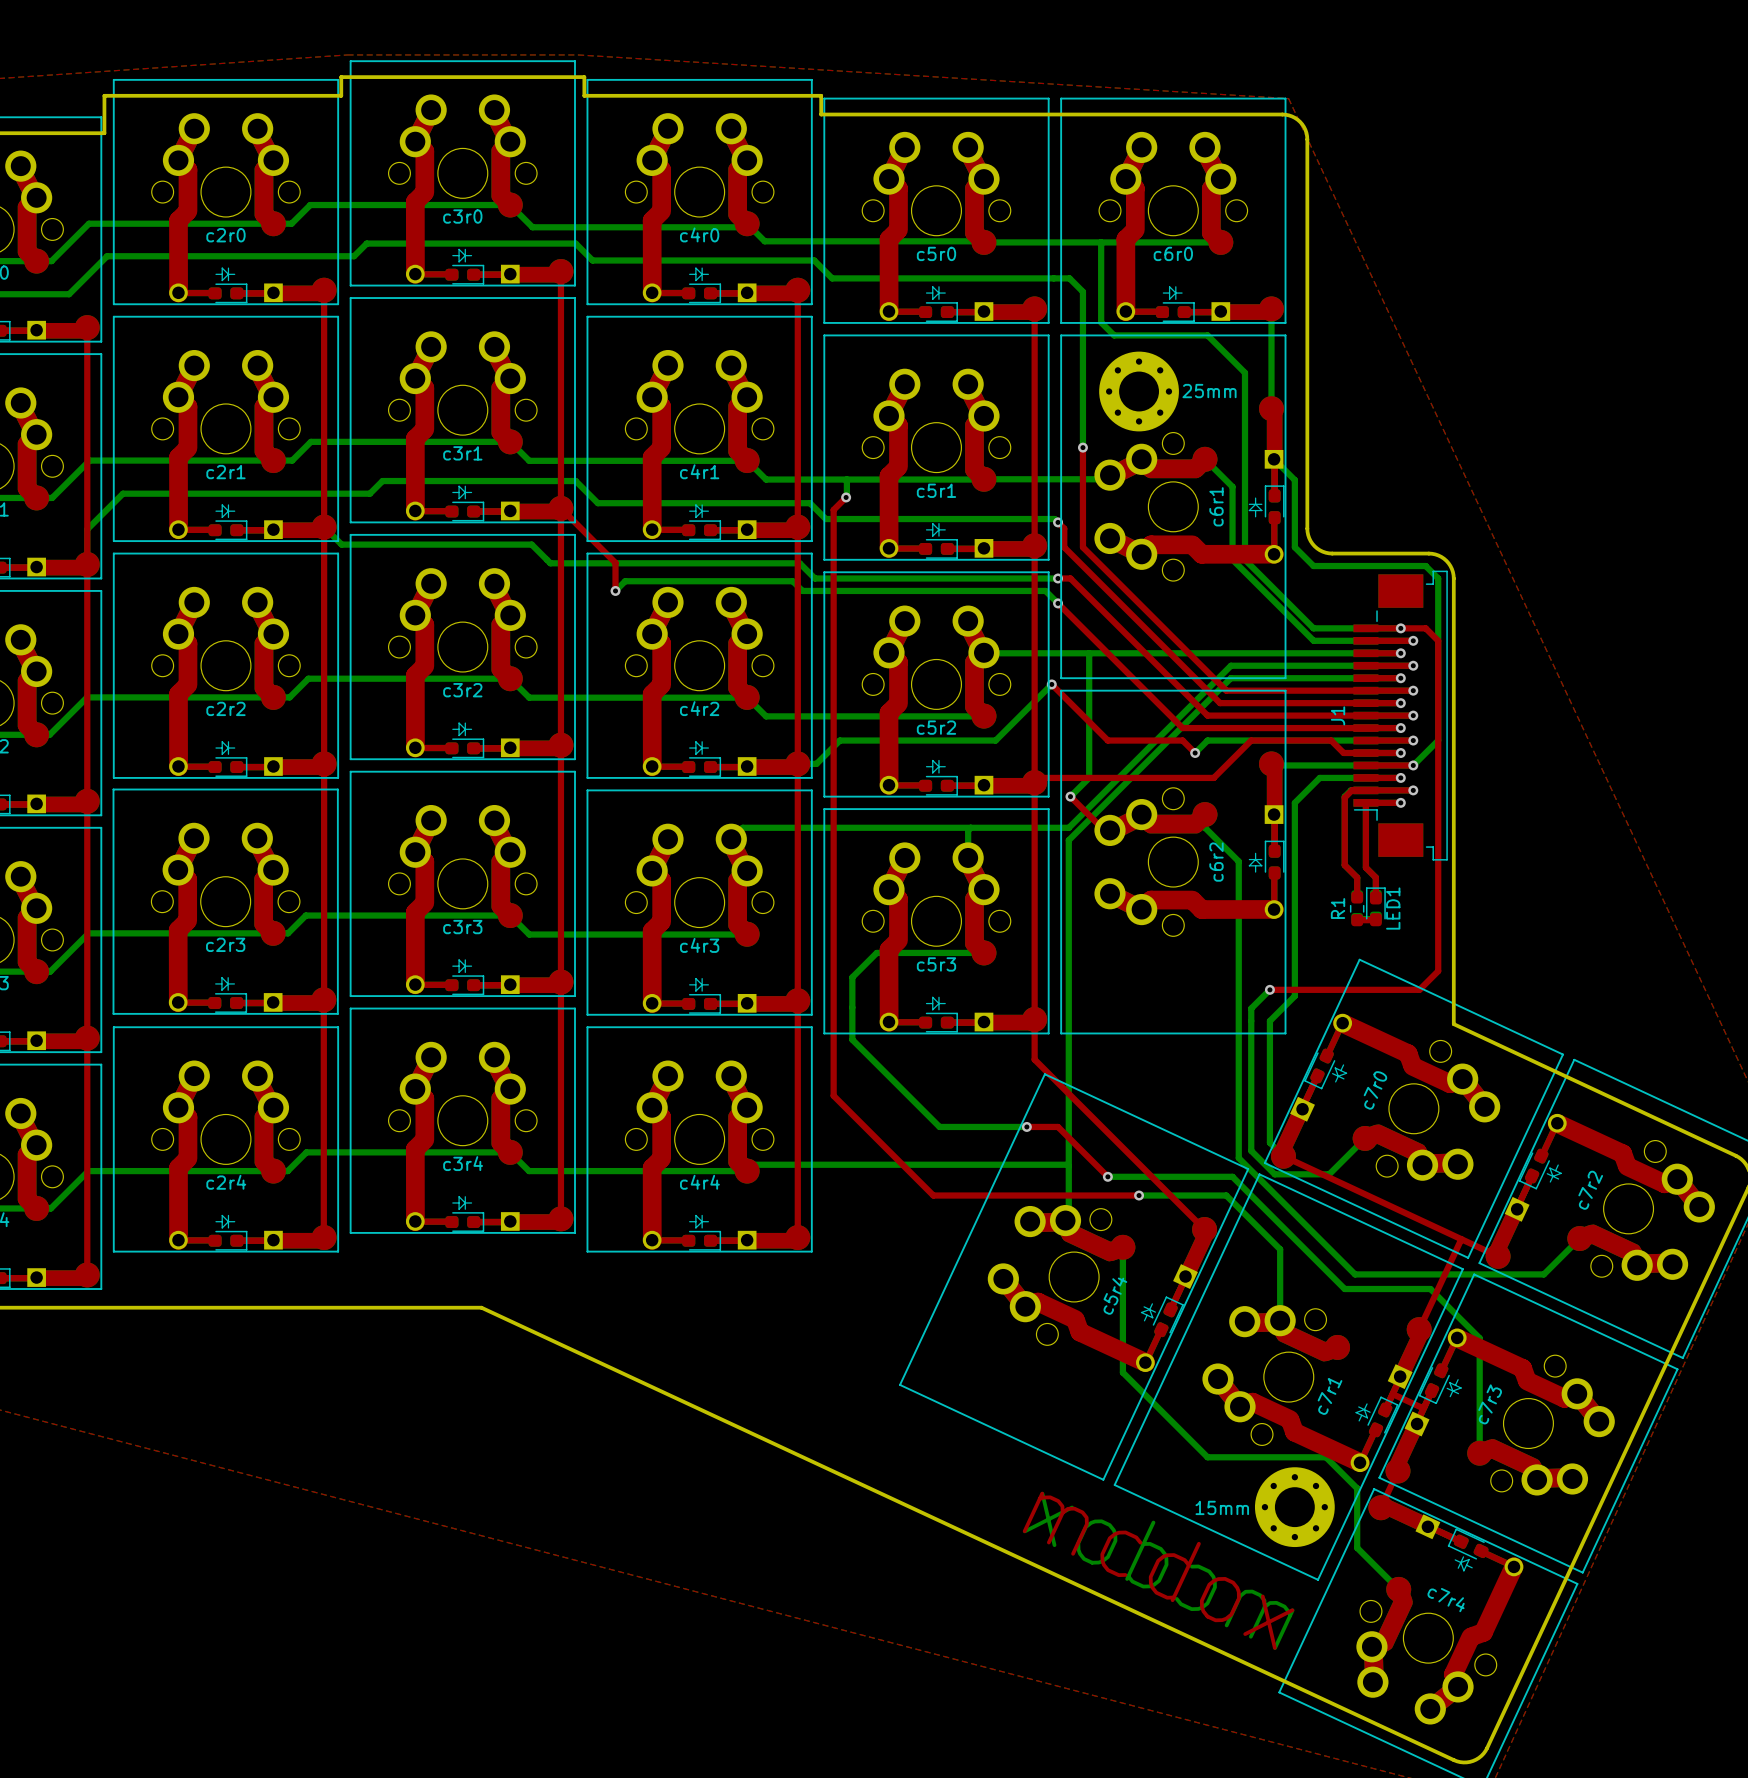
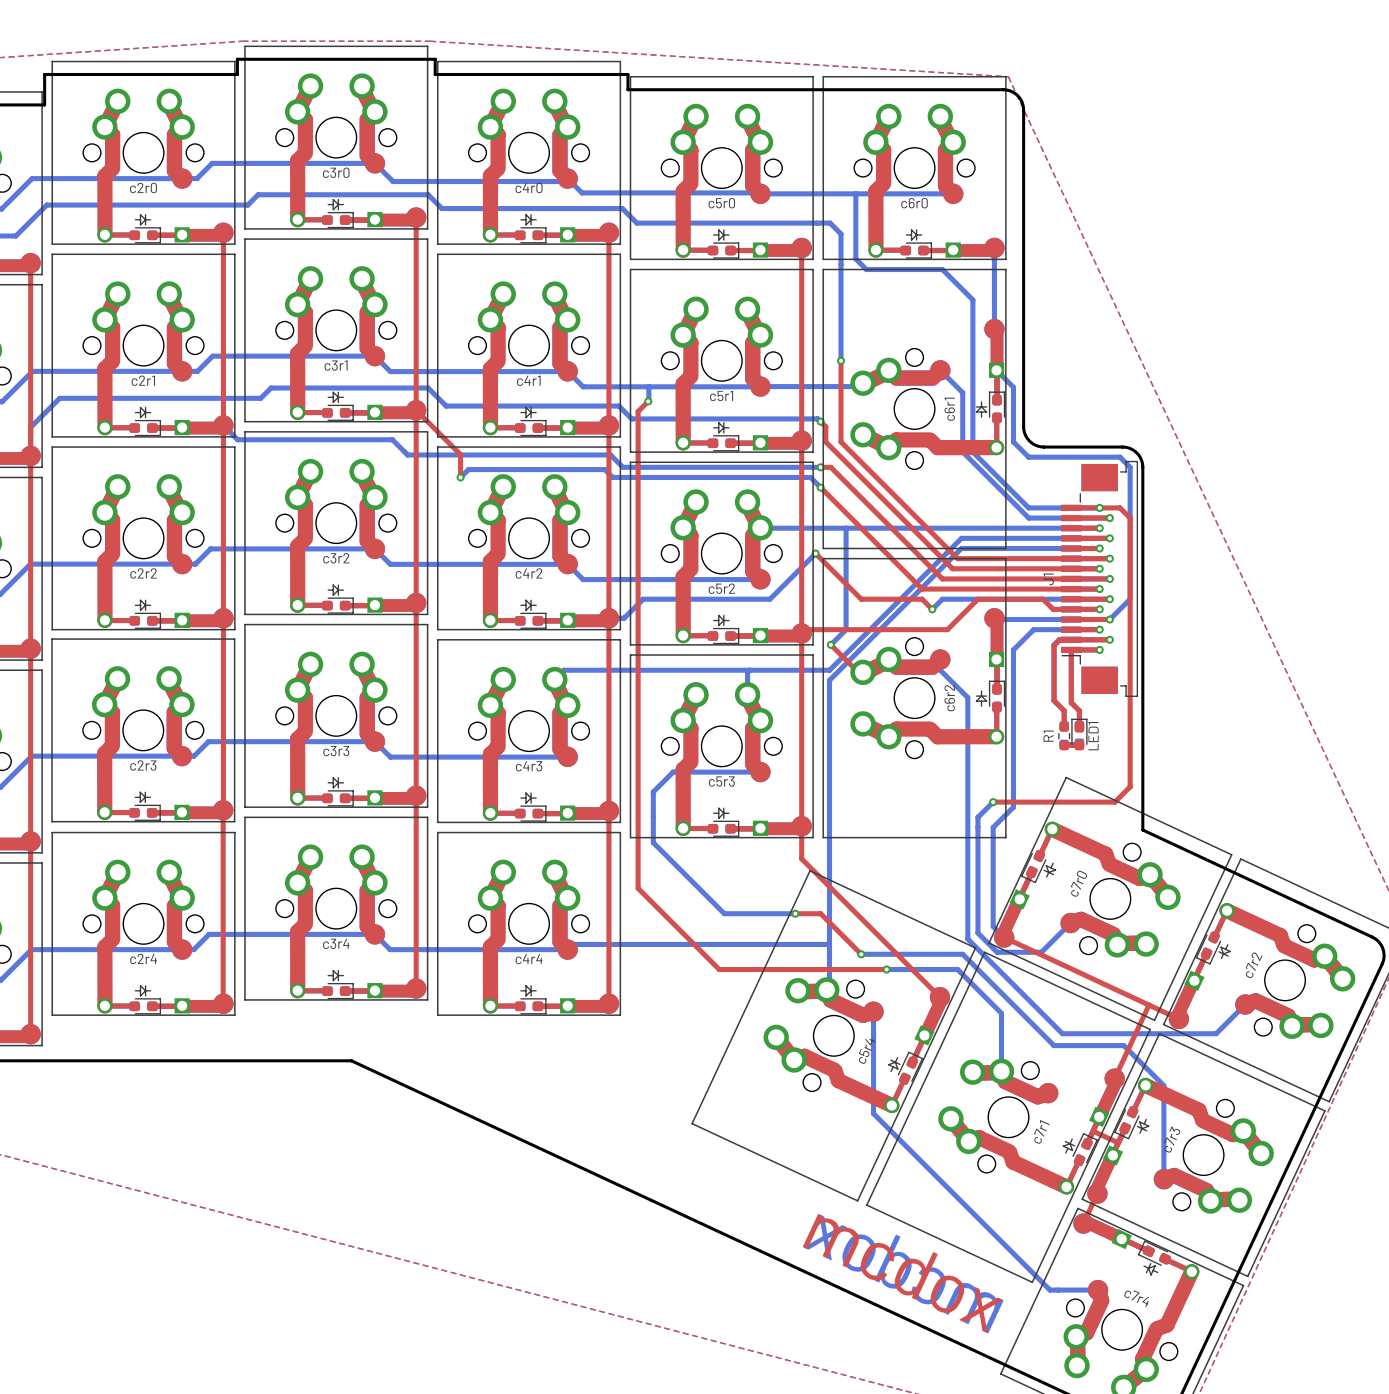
25mm: (1139, 391) -> none
bottom track: (1207, 1457) (1326, 1457) (1357, 1488) (1357, 1547) (1398, 1589) -> (942, 1182) (1049, 1290) (1097, 1290)
15mm: (1294, 1507) -> none

